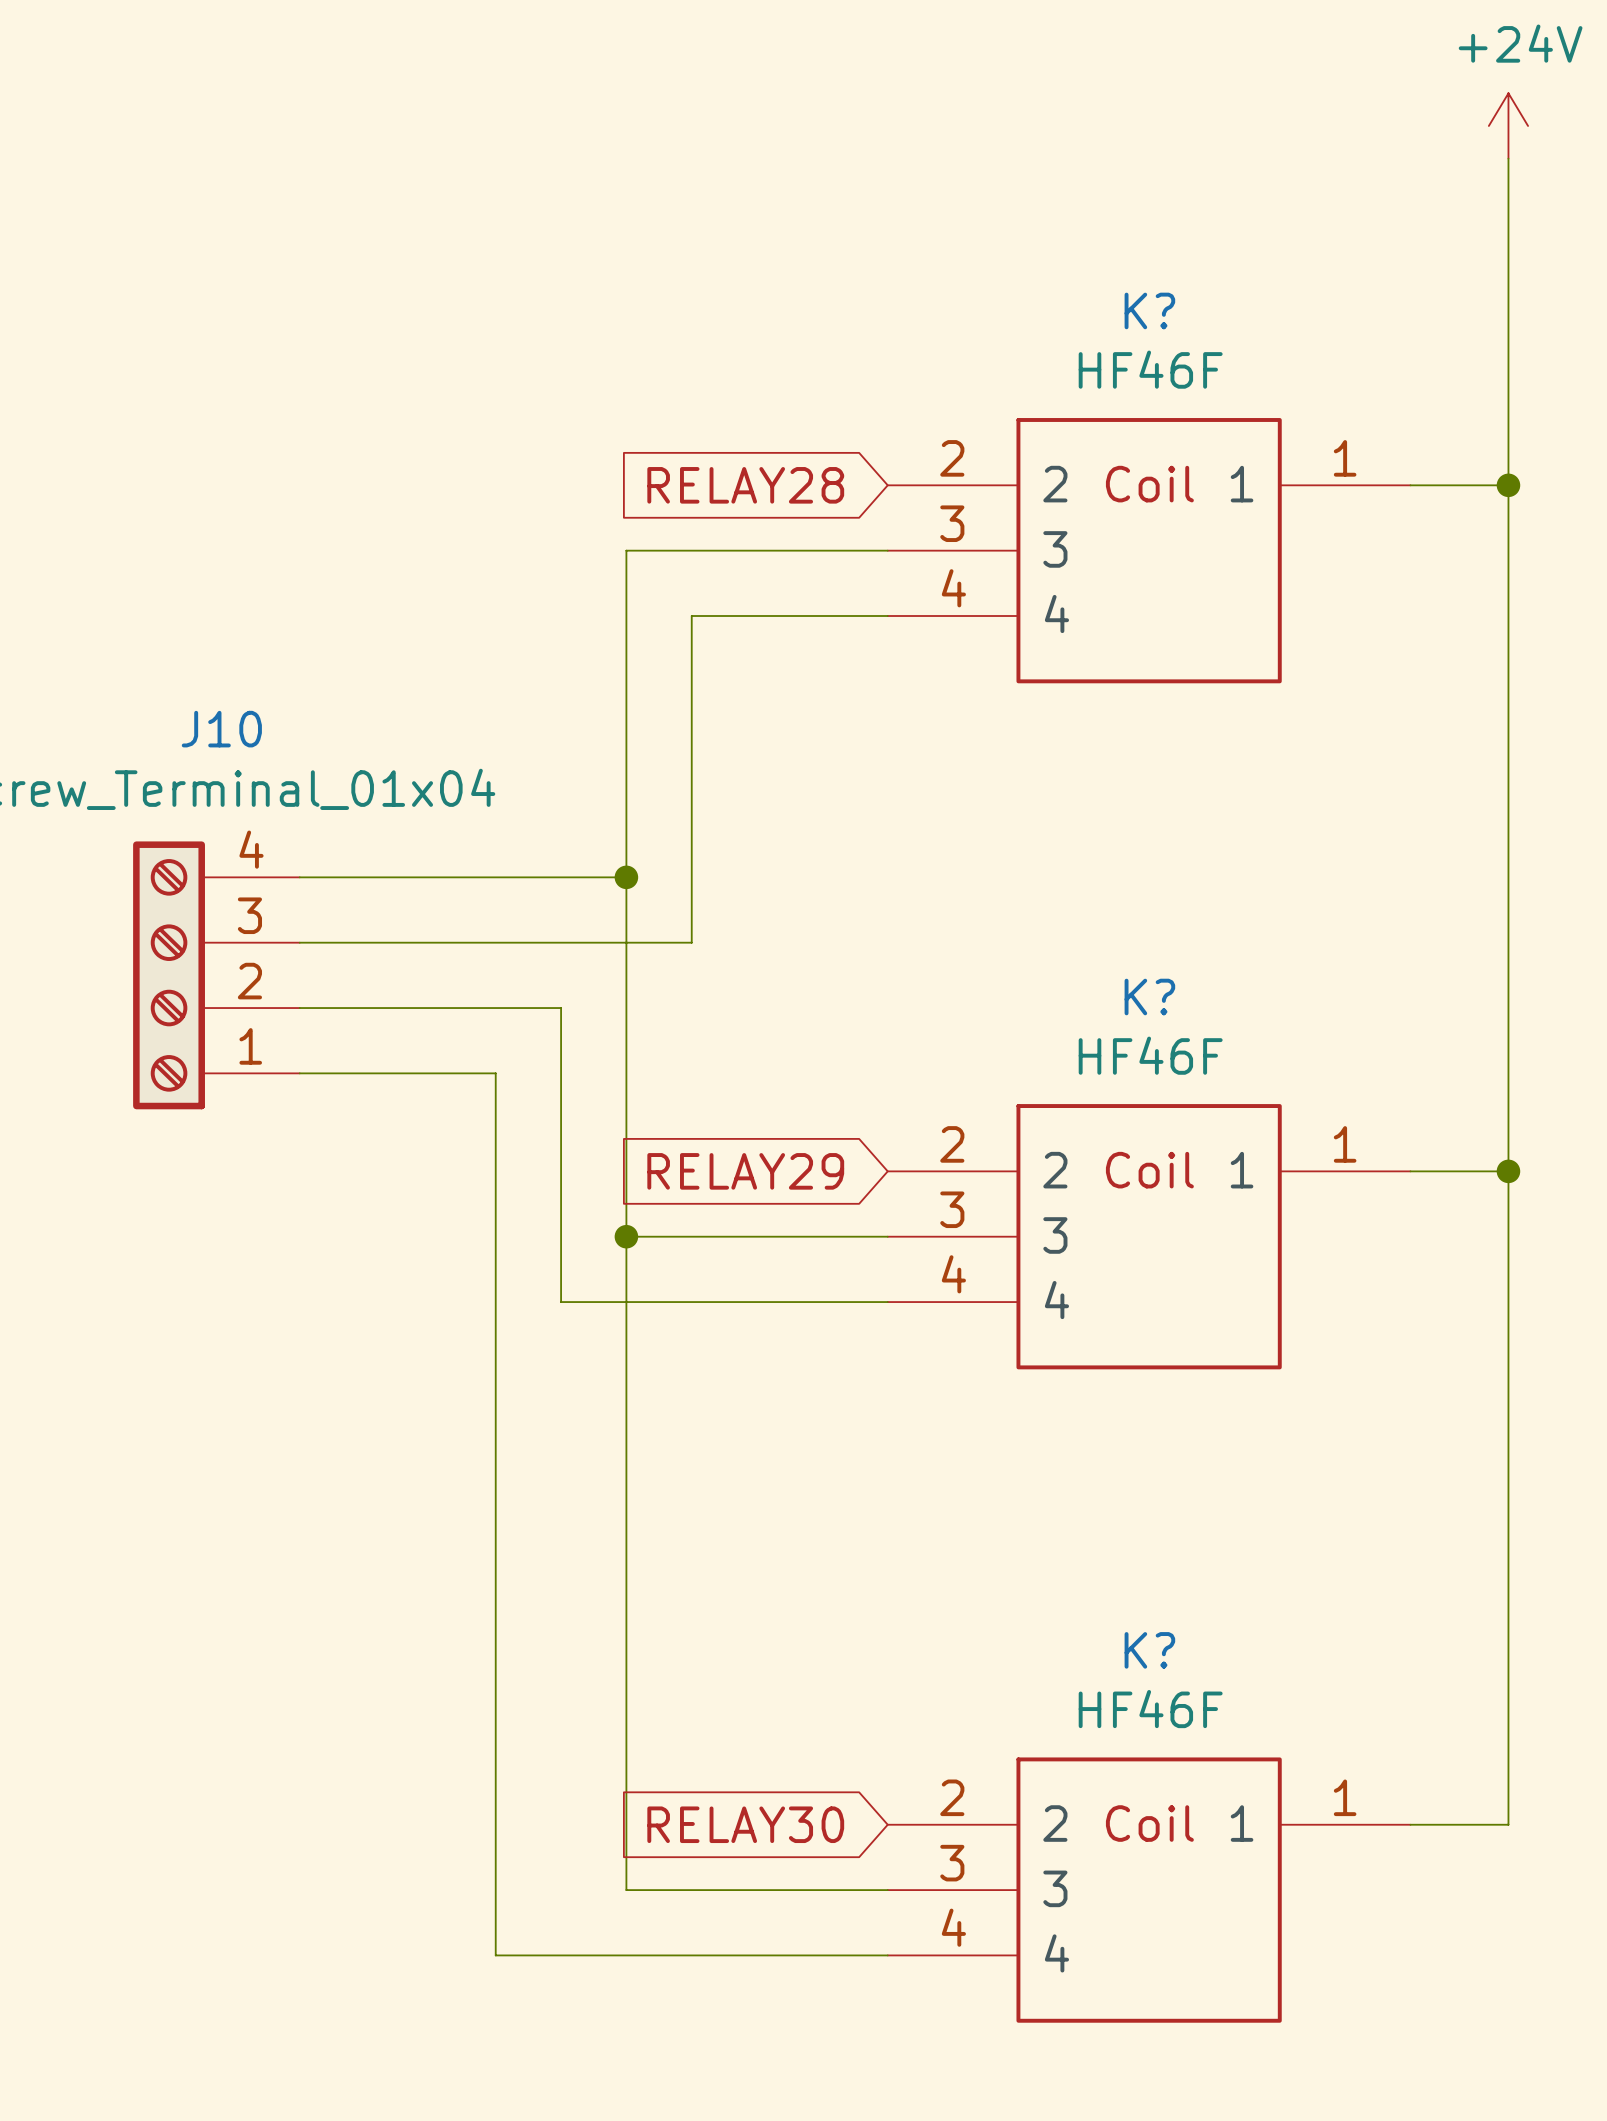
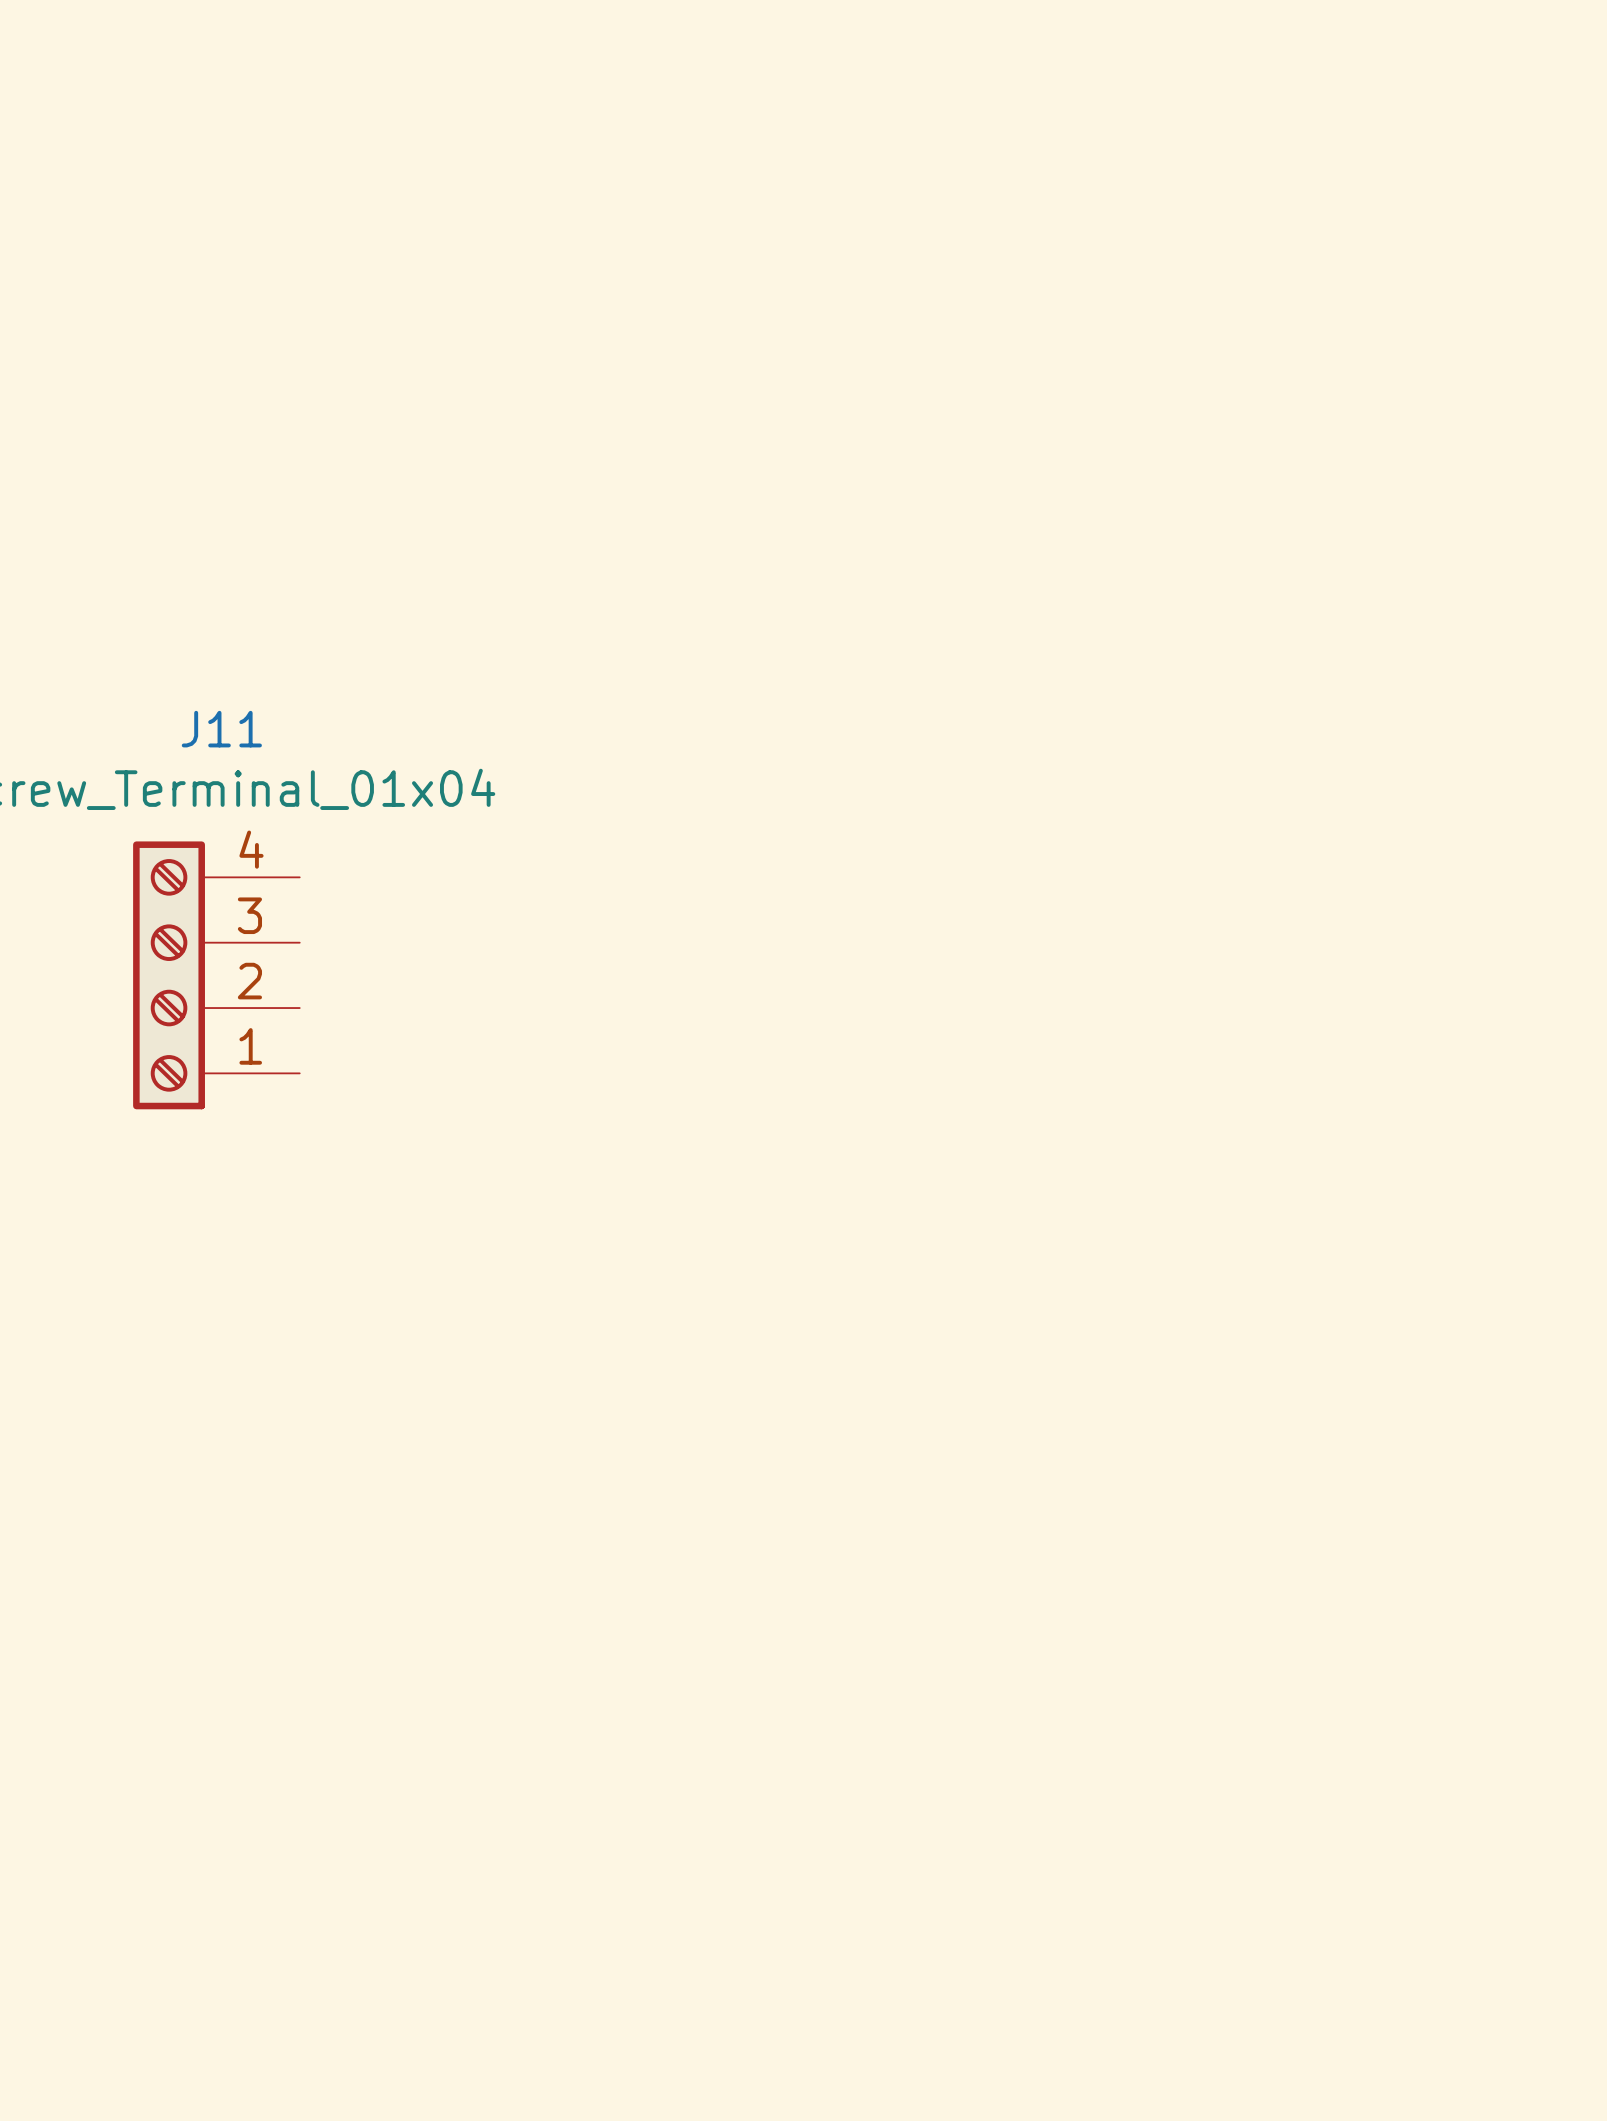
power symbol: +24V (1508, 125) -> none
wire: (1508, 158) (1508, 1824) (1410, 1824) -> none
global label: RELAY28 (745, 485) -> none
wire: (1410, 485) (1508, 485) -> none
junction: (1508, 485) -> none
wire: (887, 550) (626, 550) (626, 1890) (887, 1890) -> none
K?: HF46F (1149, 550) -> none
wire: (887, 616) (691, 616) (691, 942) (299, 942) -> none
J10 name: J10 (221, 729) -> J11 (221, 729)
wire: (299, 877) (626, 877) -> none
junction: (626, 877) -> none
wire: (299, 1008) (561, 1008) (561, 1302) (887, 1302) -> none
wire: (299, 1073) (495, 1073) (495, 1955) (887, 1955) -> none
global label: RELAY29 (745, 1171) -> none
wire: (1410, 1171) (1508, 1171) -> none
junction: (1508, 1171) -> none
wire: (626, 1236) (887, 1236) -> none
junction: (626, 1236) -> none
K?: HF46F (1149, 1236) -> none
global label: RELAY30 (745, 1824) -> none
K?: HF46F (1149, 1890) -> none

